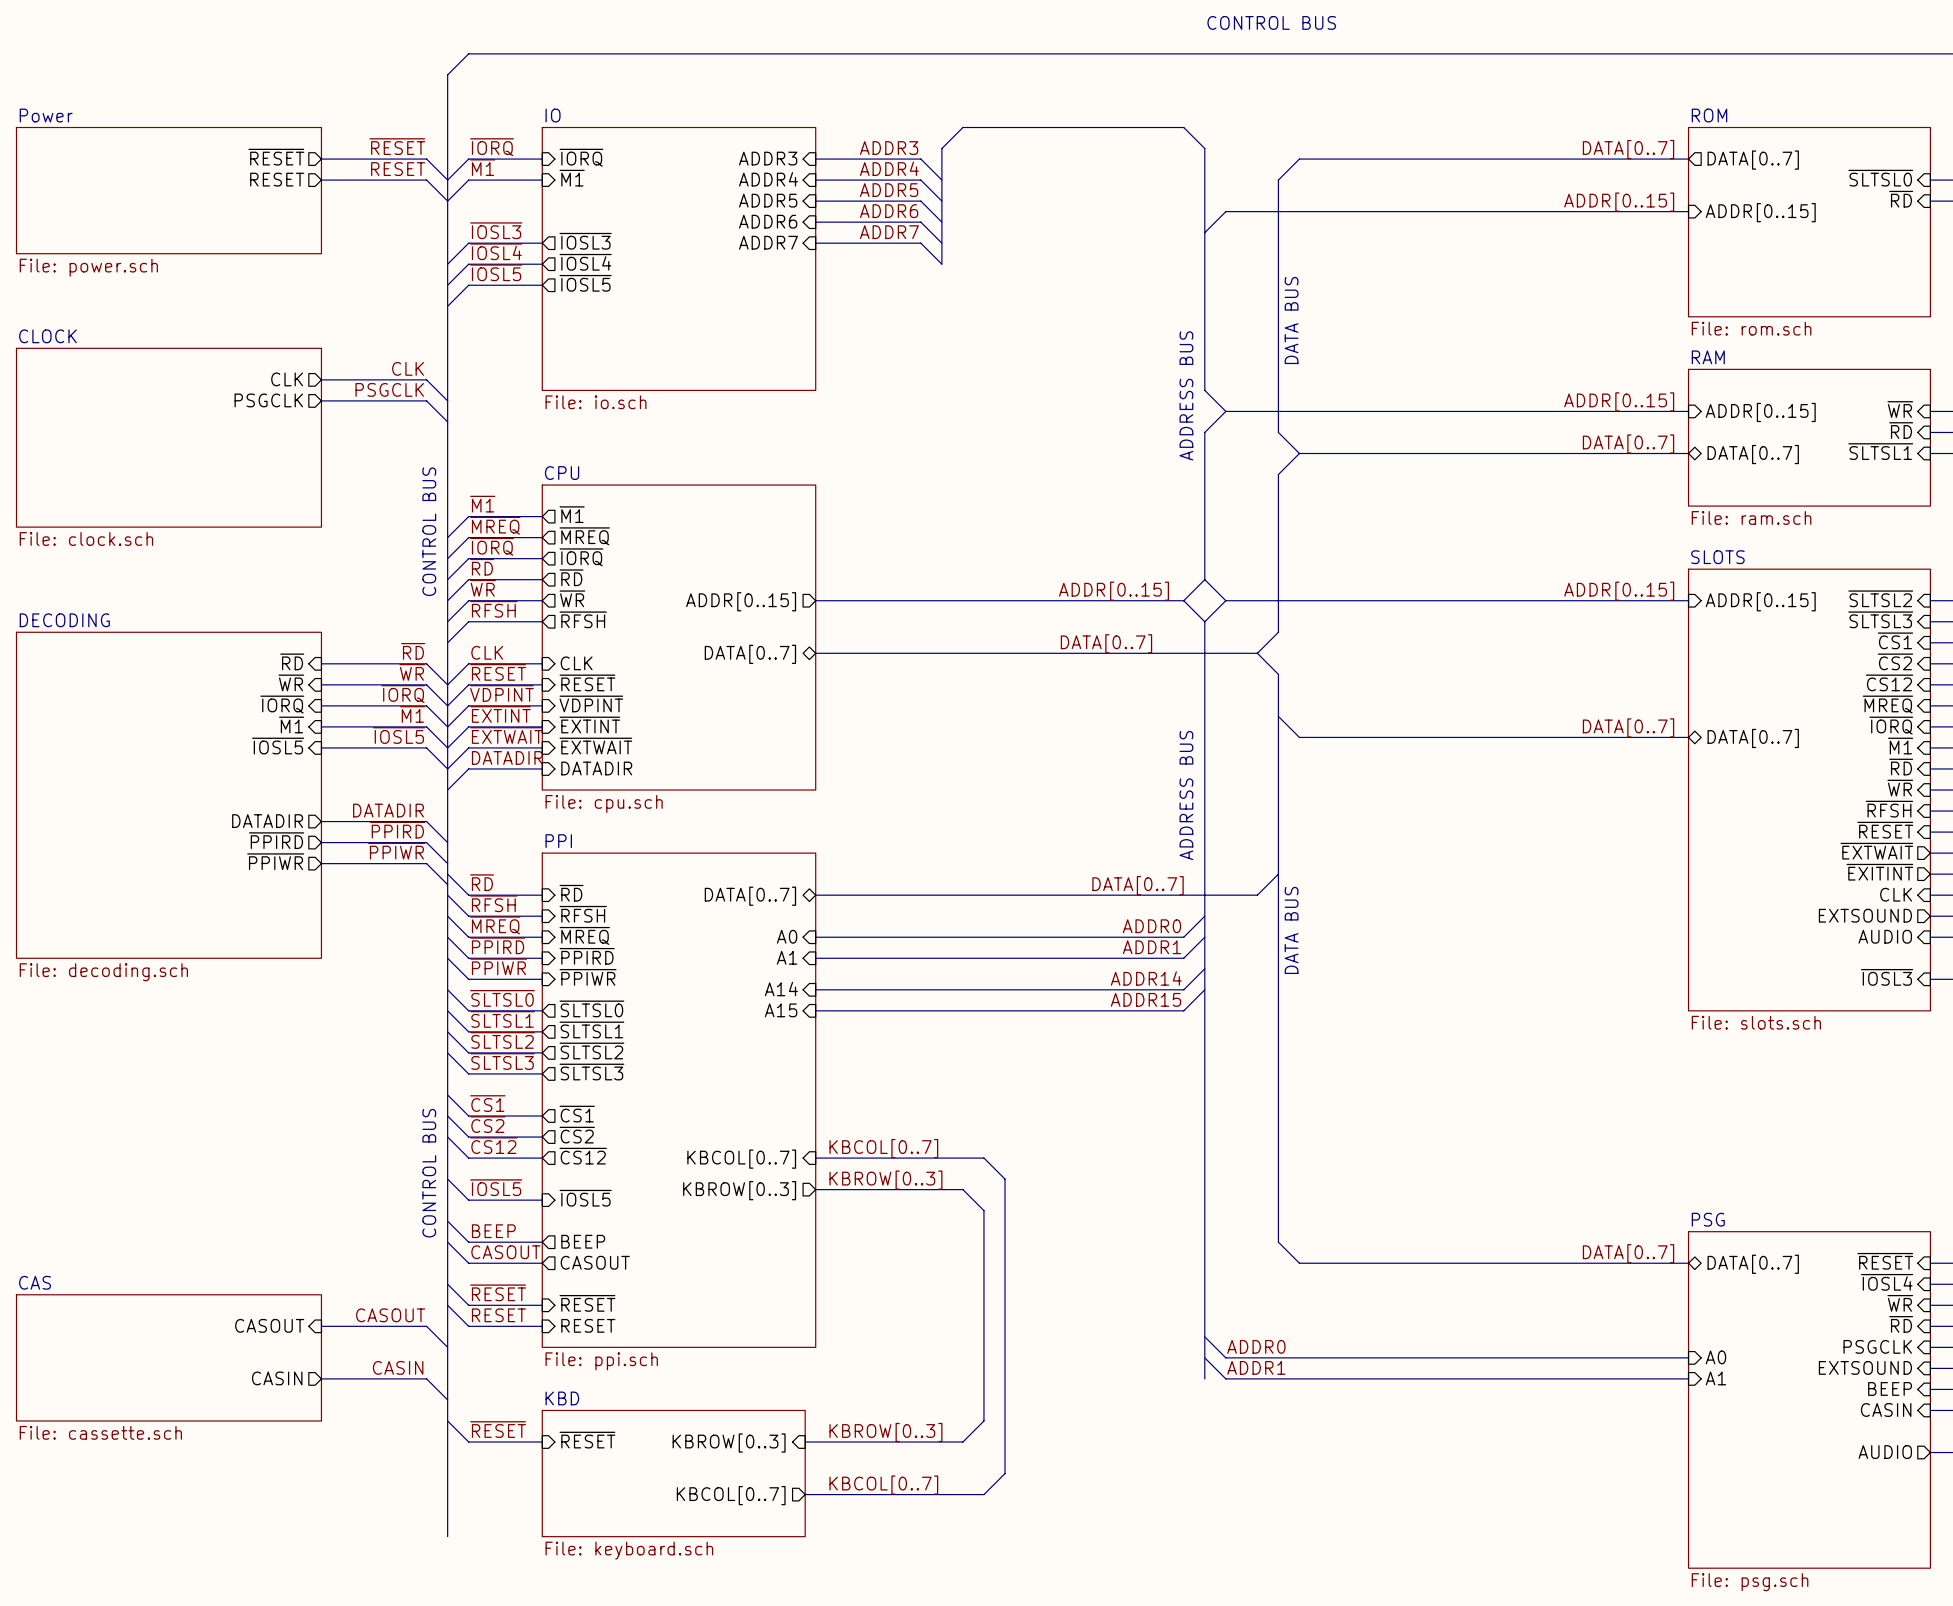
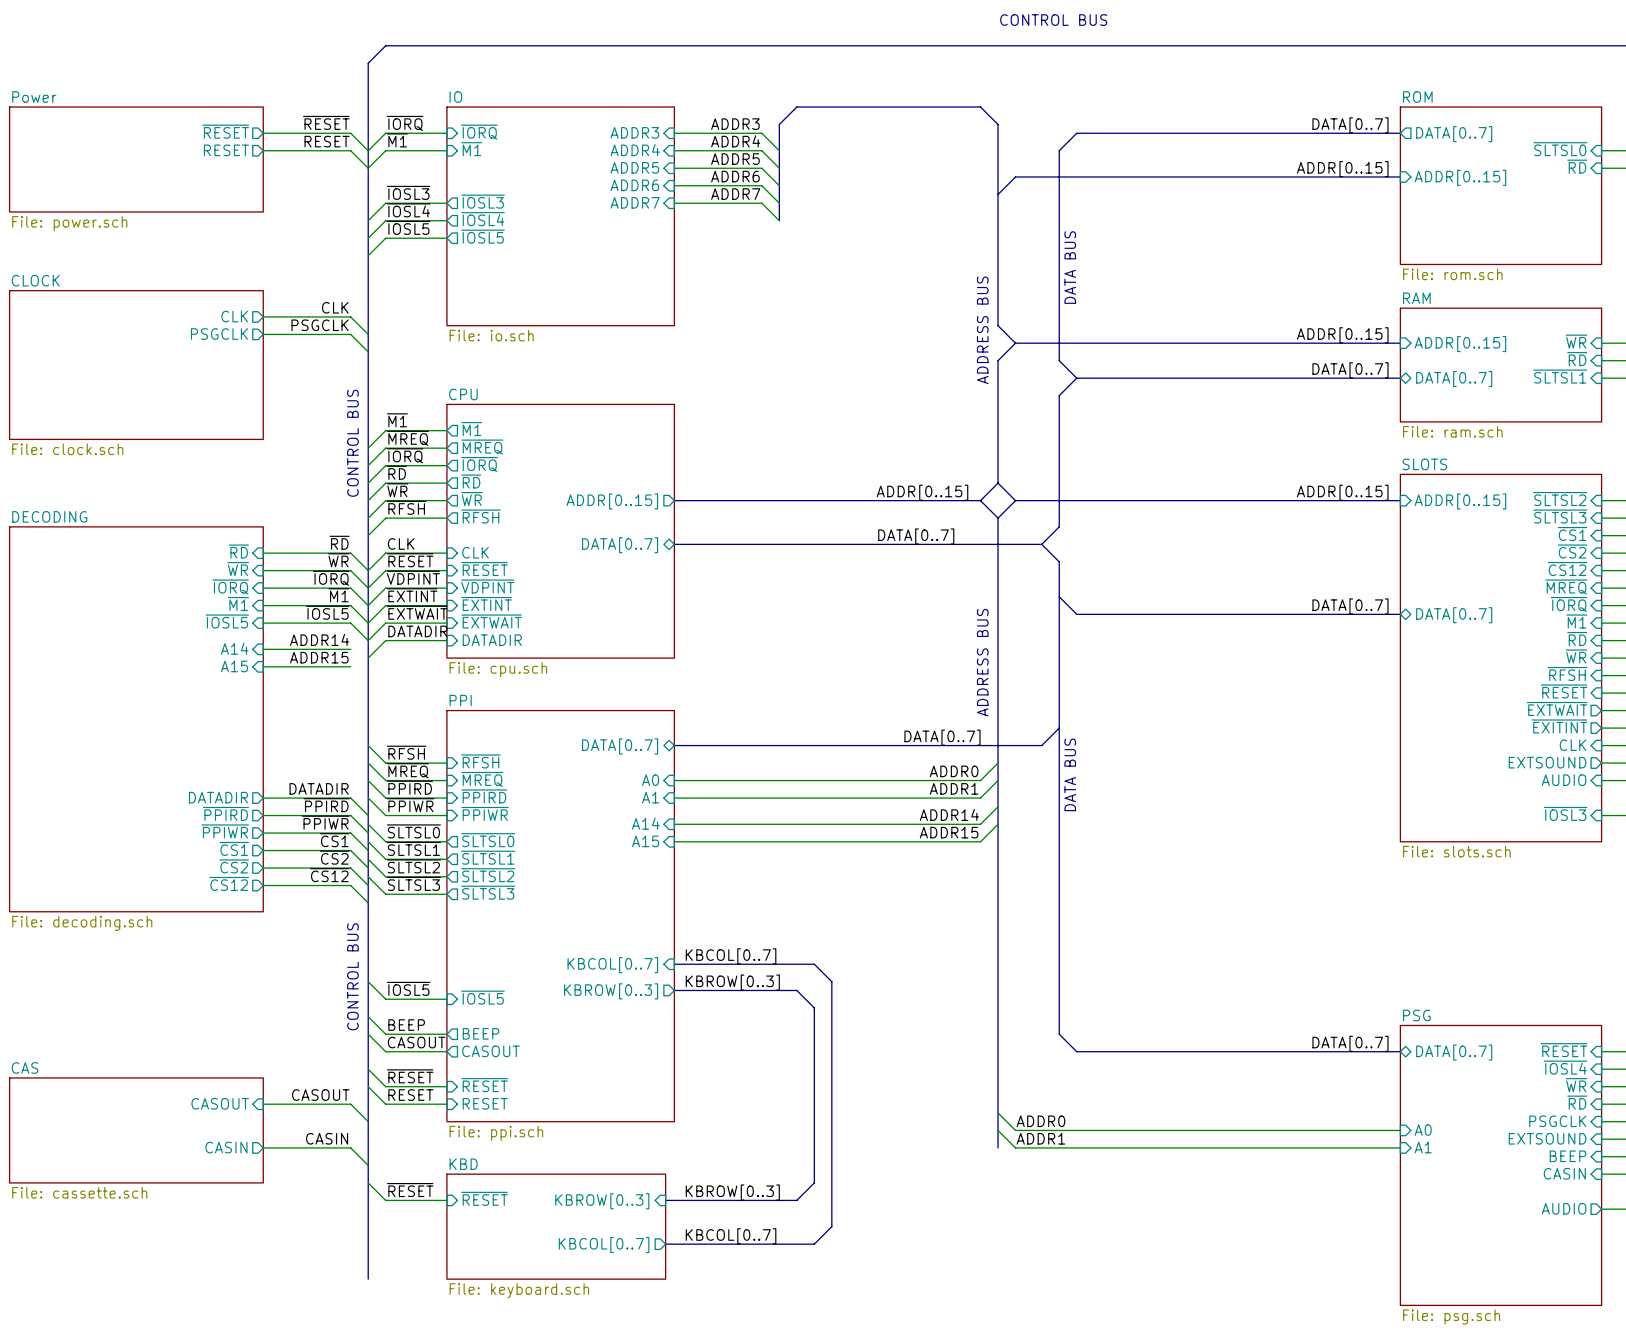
label: none -> ADDR14 (319, 639)
sheet pin: none -> A14 (234, 648)
wire: none -> (263, 649) (350, 649)
label: none -> ADDR15 (319, 657)
sheet DECODING: File: decoding.sch (168, 795) -> none
sheet pin: none -> A15 (234, 666)
wire: none -> (263, 666) (350, 666)
label position: DATADIR (388, 810) -> DATADIR (319, 788)
sheet pin position: DATADIR (267, 821) -> DATADIR (218, 797)
wire: (321, 821) (426, 821) (447, 842) -> (263, 798) (350, 798) (368, 815)
label position: ~{PPIRD} (397, 830) -> ~{PPIRD} (326, 805)
sheet pin position: ~{PPIRD} (276, 840) -> ~{PPIRD} (225, 813)
wire: (321, 842) (426, 842) (447, 863) -> (263, 815) (350, 815) (368, 833)
label position: ~{PPIWR} (396, 851) -> ~{PPIWR} (325, 822)
sheet pin position: ~{PPIWR} (275, 861) -> ~{PPIWR} (225, 831)
sheet DECODING: none -> File: decoding.sch (136, 719)
wire: (321, 863) (426, 863) (447, 884) -> (263, 833) (350, 833) (368, 850)
wire: (447, 874) (468, 895) (542, 895) -> none
label: ~{RD} (482, 882) -> none
sheet pin: ~{RD} (571, 893) -> none
sheet pin: none -> ~{CS1} (234, 848)
wire: none -> (263, 850) (350, 850) (368, 868)
sheet pin: none -> ~{CS2} (234, 866)
wire: none -> (263, 868) (350, 868) (368, 885)
sheet pin: none -> ~{CS12} (229, 883)
wire: none -> (263, 885) (350, 885) (368, 903)
wire: (447, 1094) (468, 1116) (542, 1116) -> none
label position: ~{CS1} (487, 1103) -> ~{CS1} (334, 840)
sheet pin: ~{CS1} (577, 1114) -> none
wire: (447, 1116) (468, 1137) (542, 1137) -> none
label position: ~{CS2} (487, 1124) -> ~{CS2} (334, 857)
sheet pin: ~{CS2} (577, 1135) -> none
wire: (447, 1137) (468, 1158) (542, 1158) -> none
label position: ~{CS12} (493, 1145) -> ~{CS12} (329, 875)
sheet pin: ~{CS12} (583, 1156) -> none

